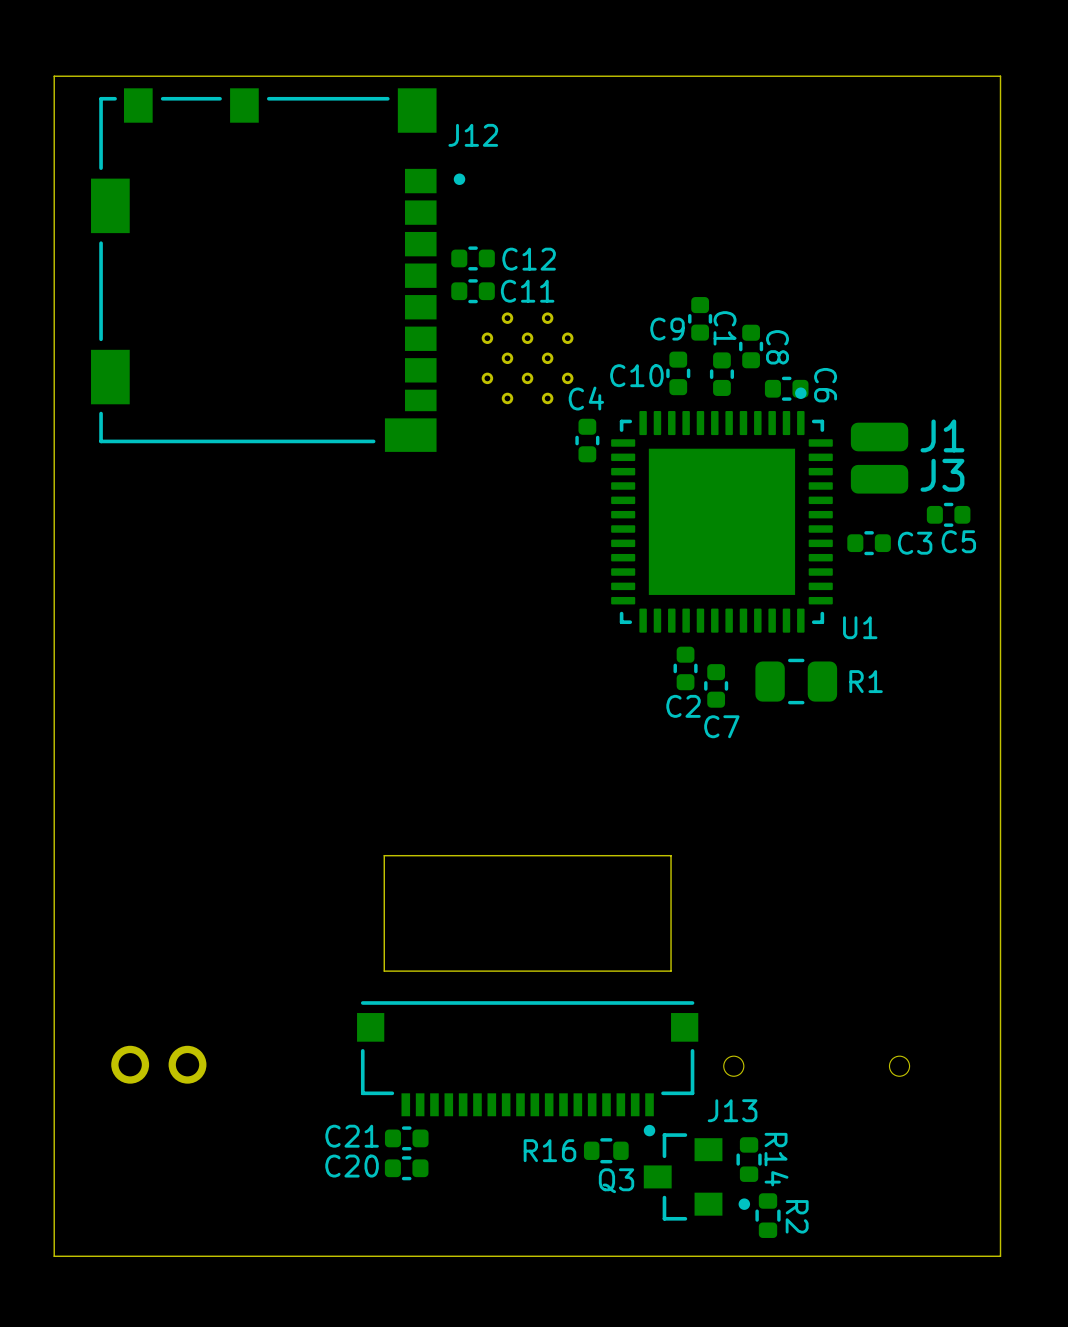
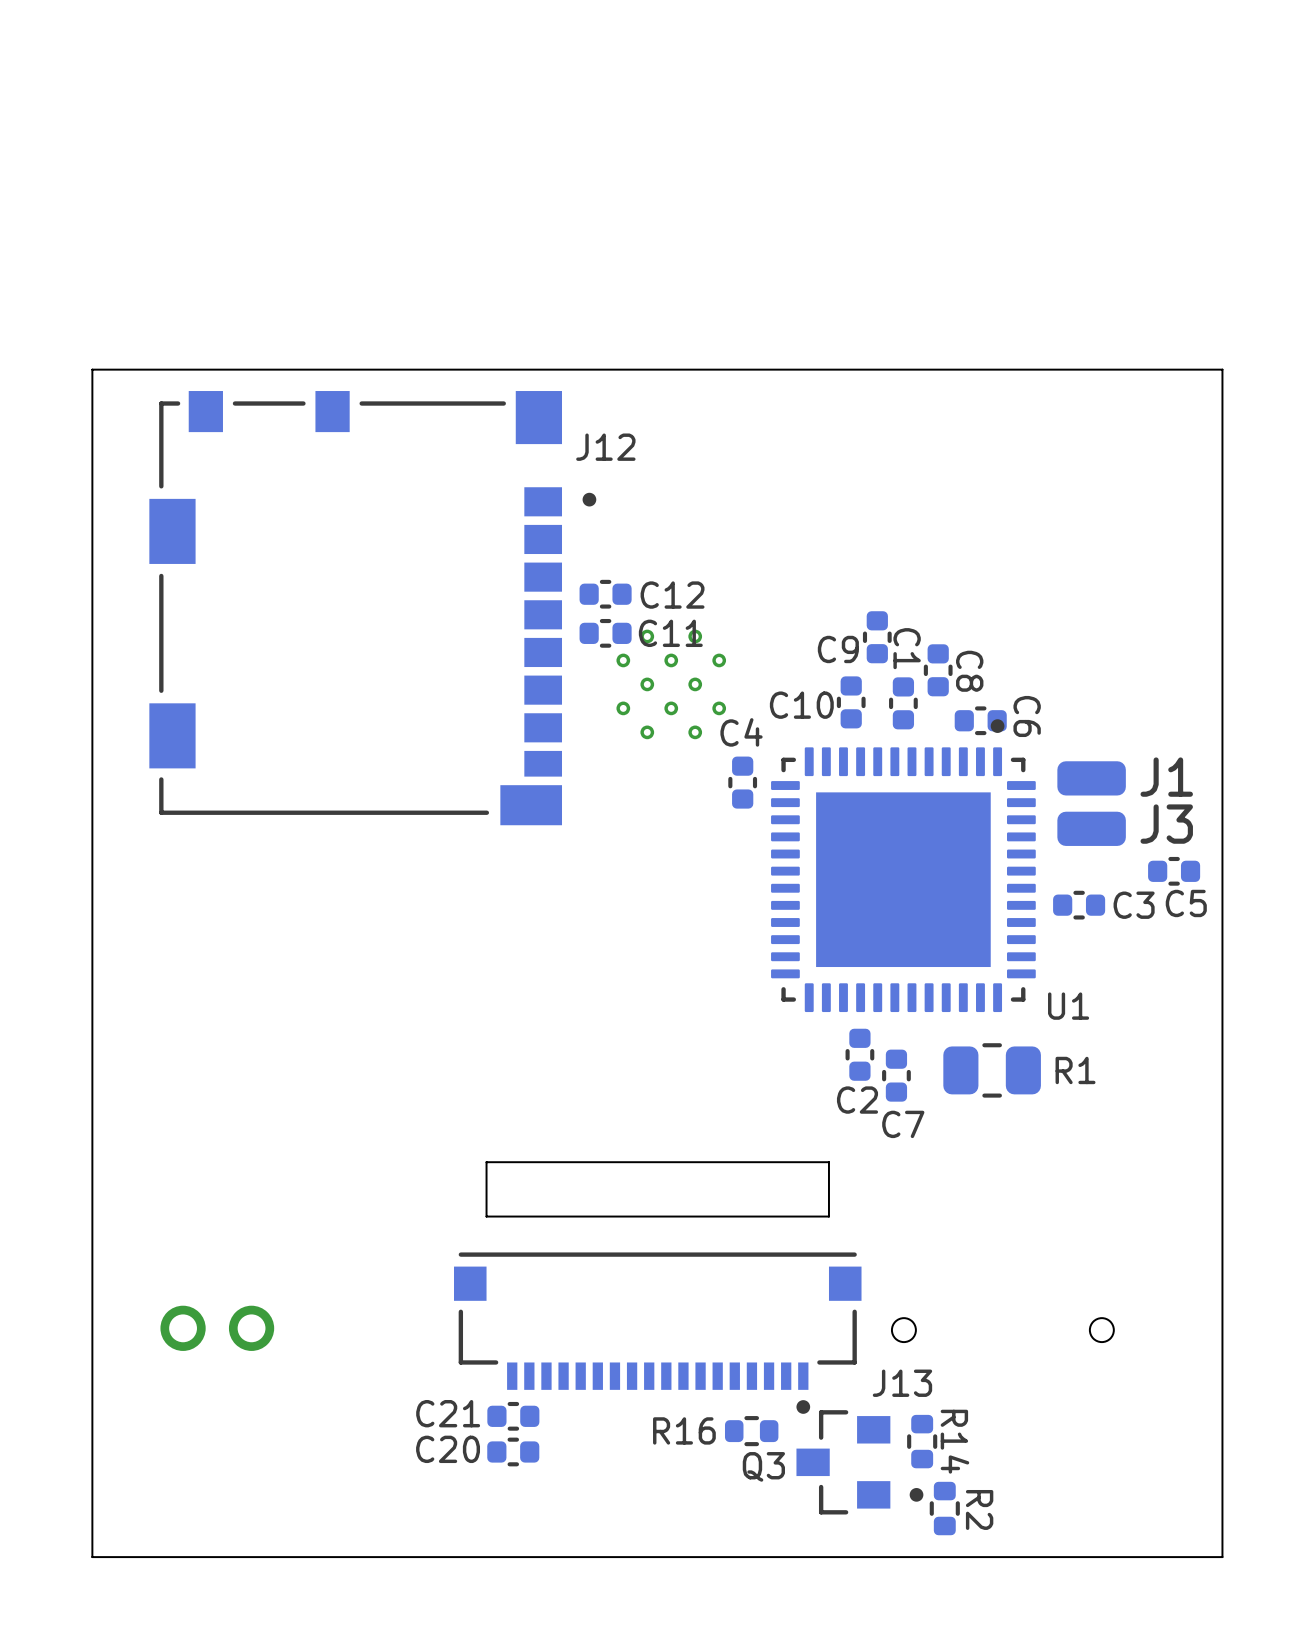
C12 position: (473, 258) -> (605, 594)
board edge: (1000, 261) (1000, 76) (54, 76) (54, 261) -> (1222, 369) (92, 369)
J12 position: (278, 270) -> (372, 608)
C11 position: (473, 291) -> (605, 633)
C9 position: (700, 318) -> (877, 637)
C8 position: (751, 346) -> (938, 670)
part position: (527, 358) -> (671, 684)
C10 position: (678, 373) -> (851, 702)
C1 position: (721, 374) -> (903, 703)
C6 position: (786, 388) -> (980, 720)
J1 position: (879, 437) -> (1091, 778)
C4 position: (587, 440) -> (742, 782)
J3 position: (879, 479) -> (1091, 828)
U1 position: (721, 510) -> (903, 865)
C5 position: (948, 514) -> (1174, 871)
C3 position: (869, 543) -> (1079, 905)
C2 position: (685, 668) -> (859, 1054)
R1 position: (796, 681) -> (992, 1070)
C7 position: (716, 685) -> (896, 1075)
board edge: (671, 925) (671, 855) (384, 855) (384, 925) -> (828, 1162) (486, 1162)

